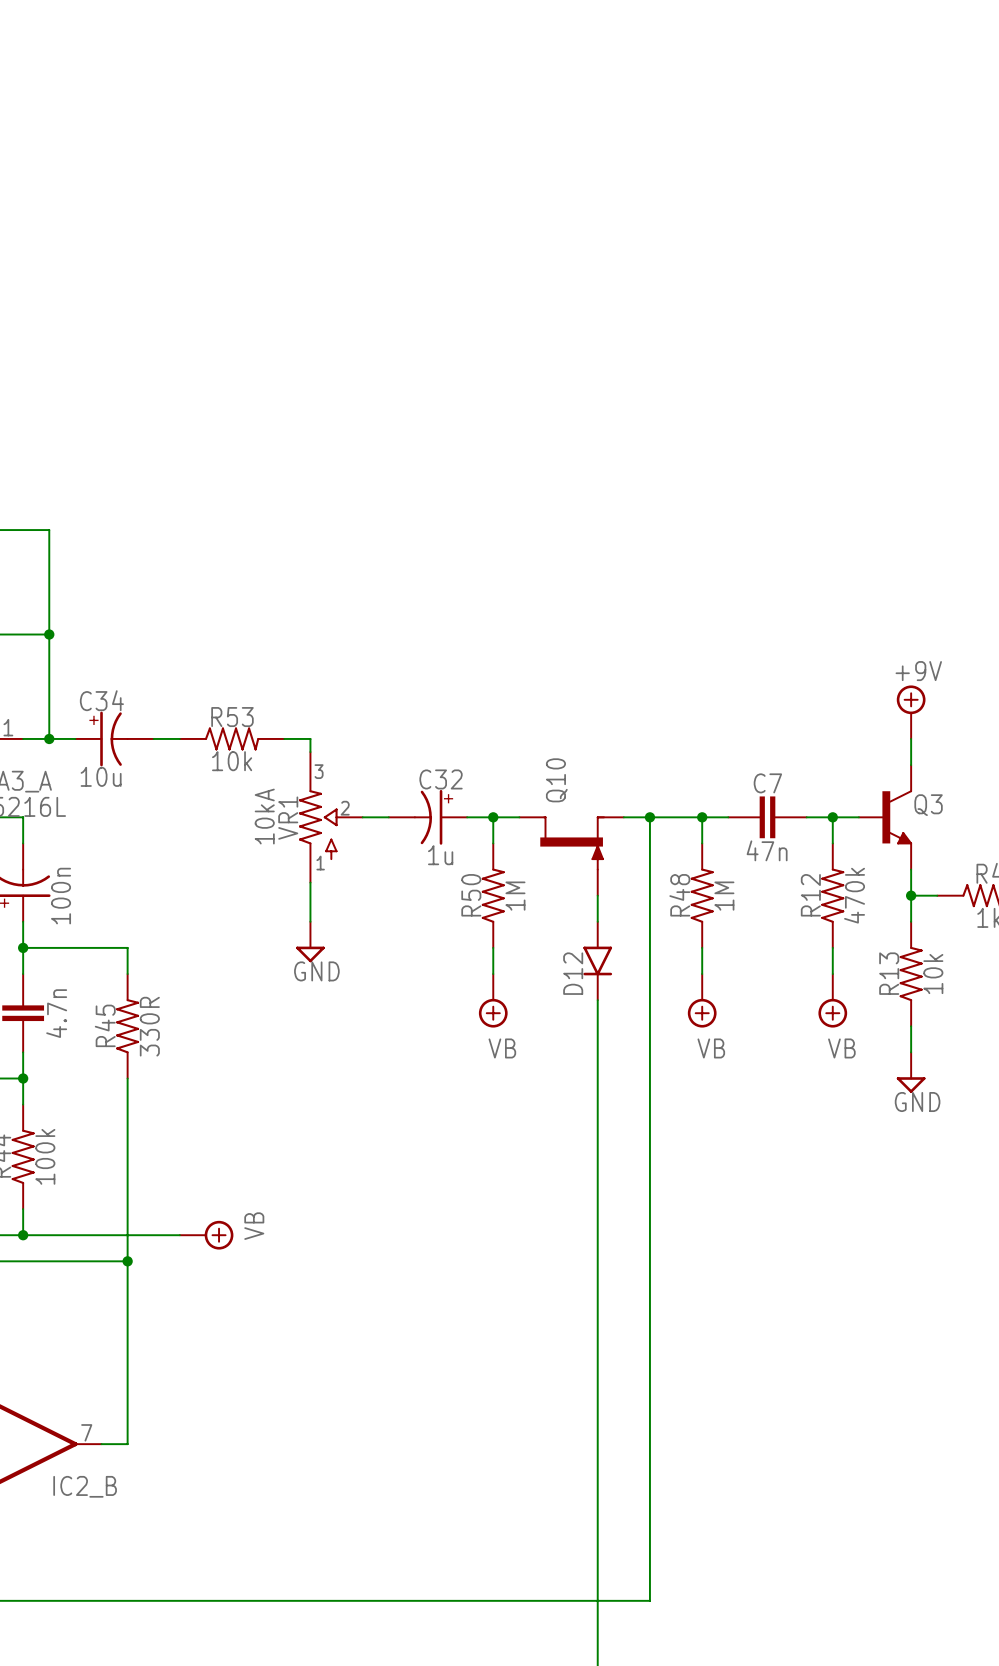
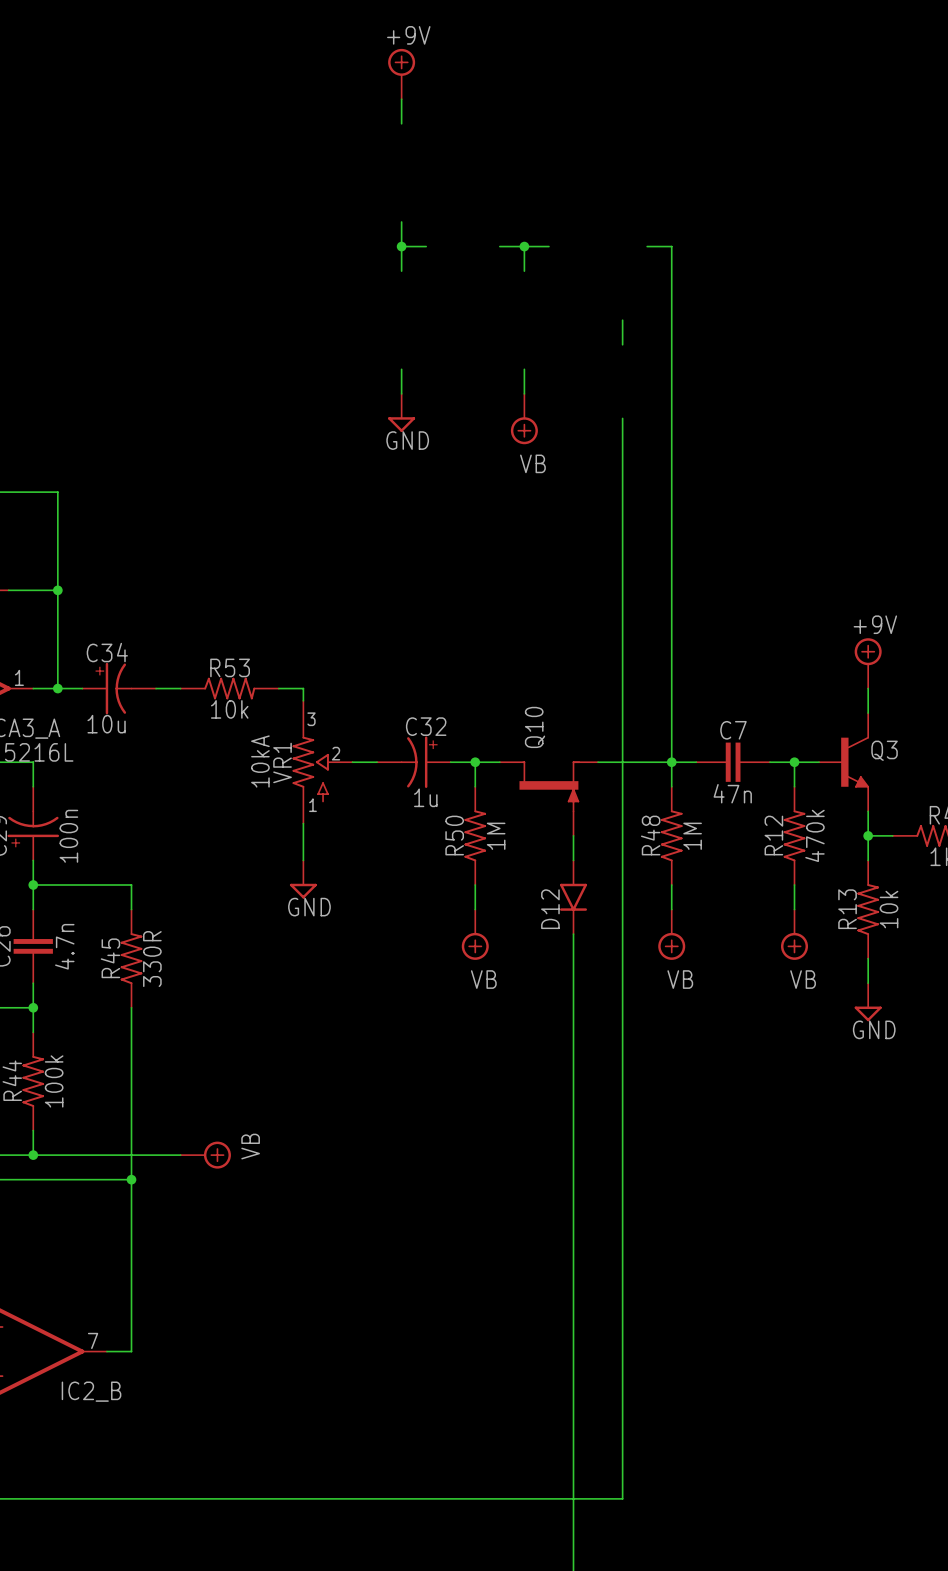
power symbol: none -> +9V (401, 74)
wire: none -> (401, 99) (401, 123)
wire: none -> (401, 222) (401, 271)
wire: none -> (401, 246) (426, 246)
junction: none -> (401, 246)
wire: none -> (499, 246) (548, 246)
wire: none -> (524, 246) (524, 271)
junction: none -> (524, 246)
wire: none -> (647, 246) (671, 246) (671, 762)
wire: none -> (622, 320) (622, 344)
wire: none -> (401, 369) (401, 393)
wire: none -> (524, 369) (524, 393)
power symbol: none -> GND (401, 412)
wire: none -> (622, 418) (622, 762)
power symbol: none -> VB (524, 419)
junction: (649, 817) -> none

